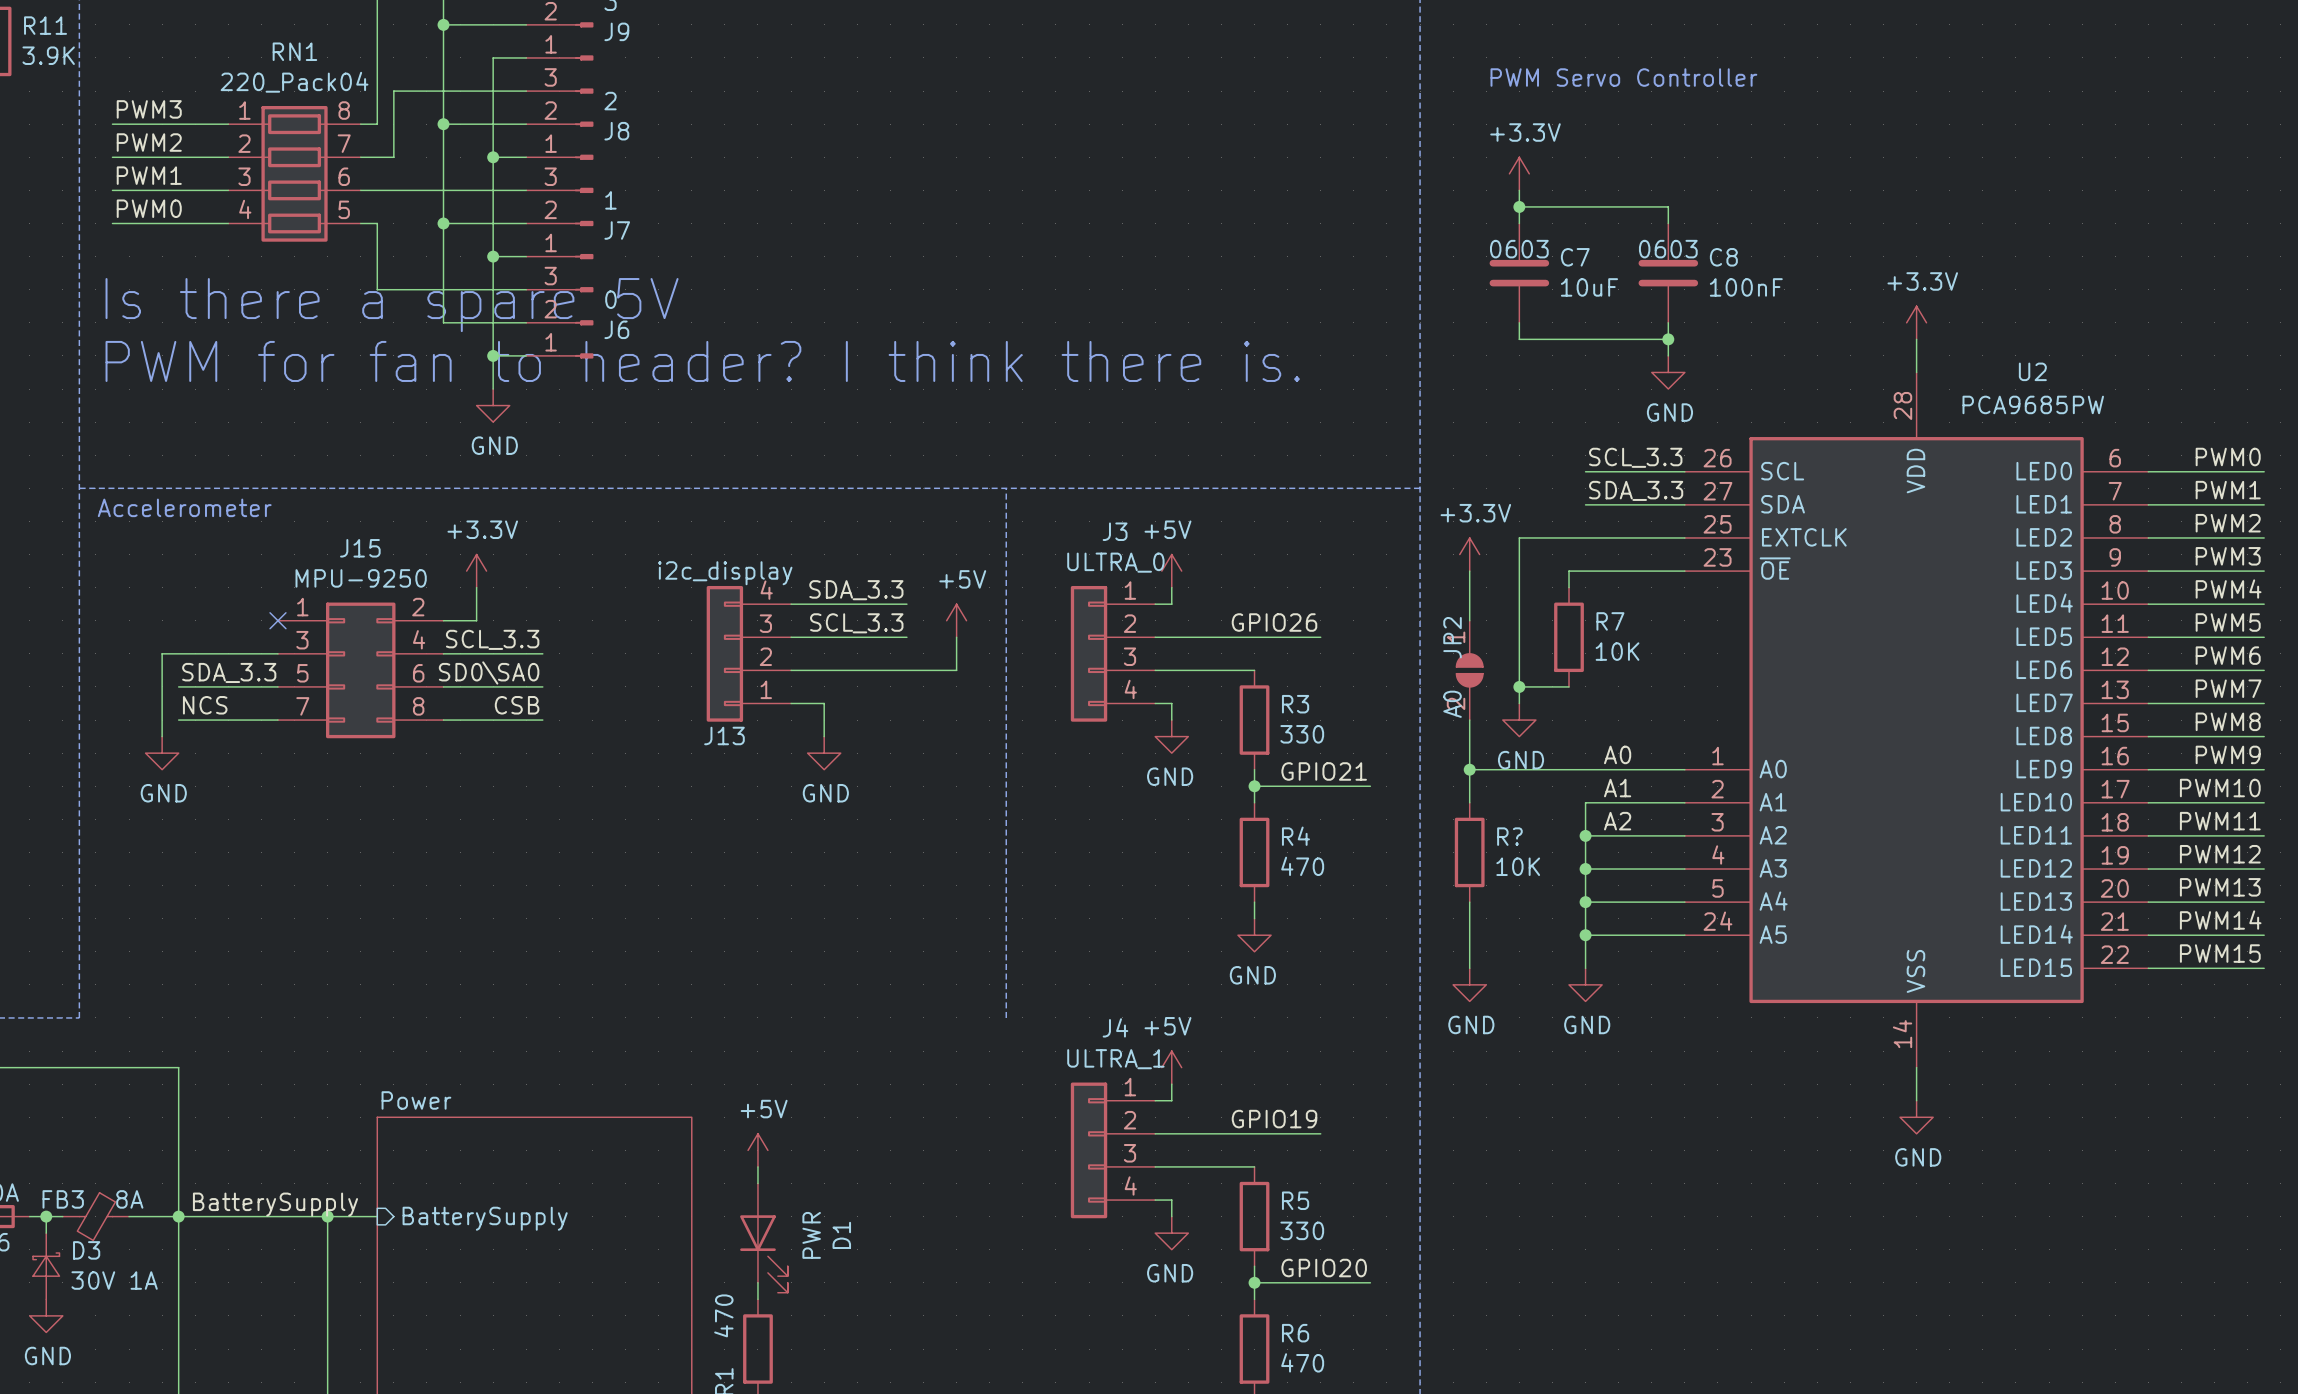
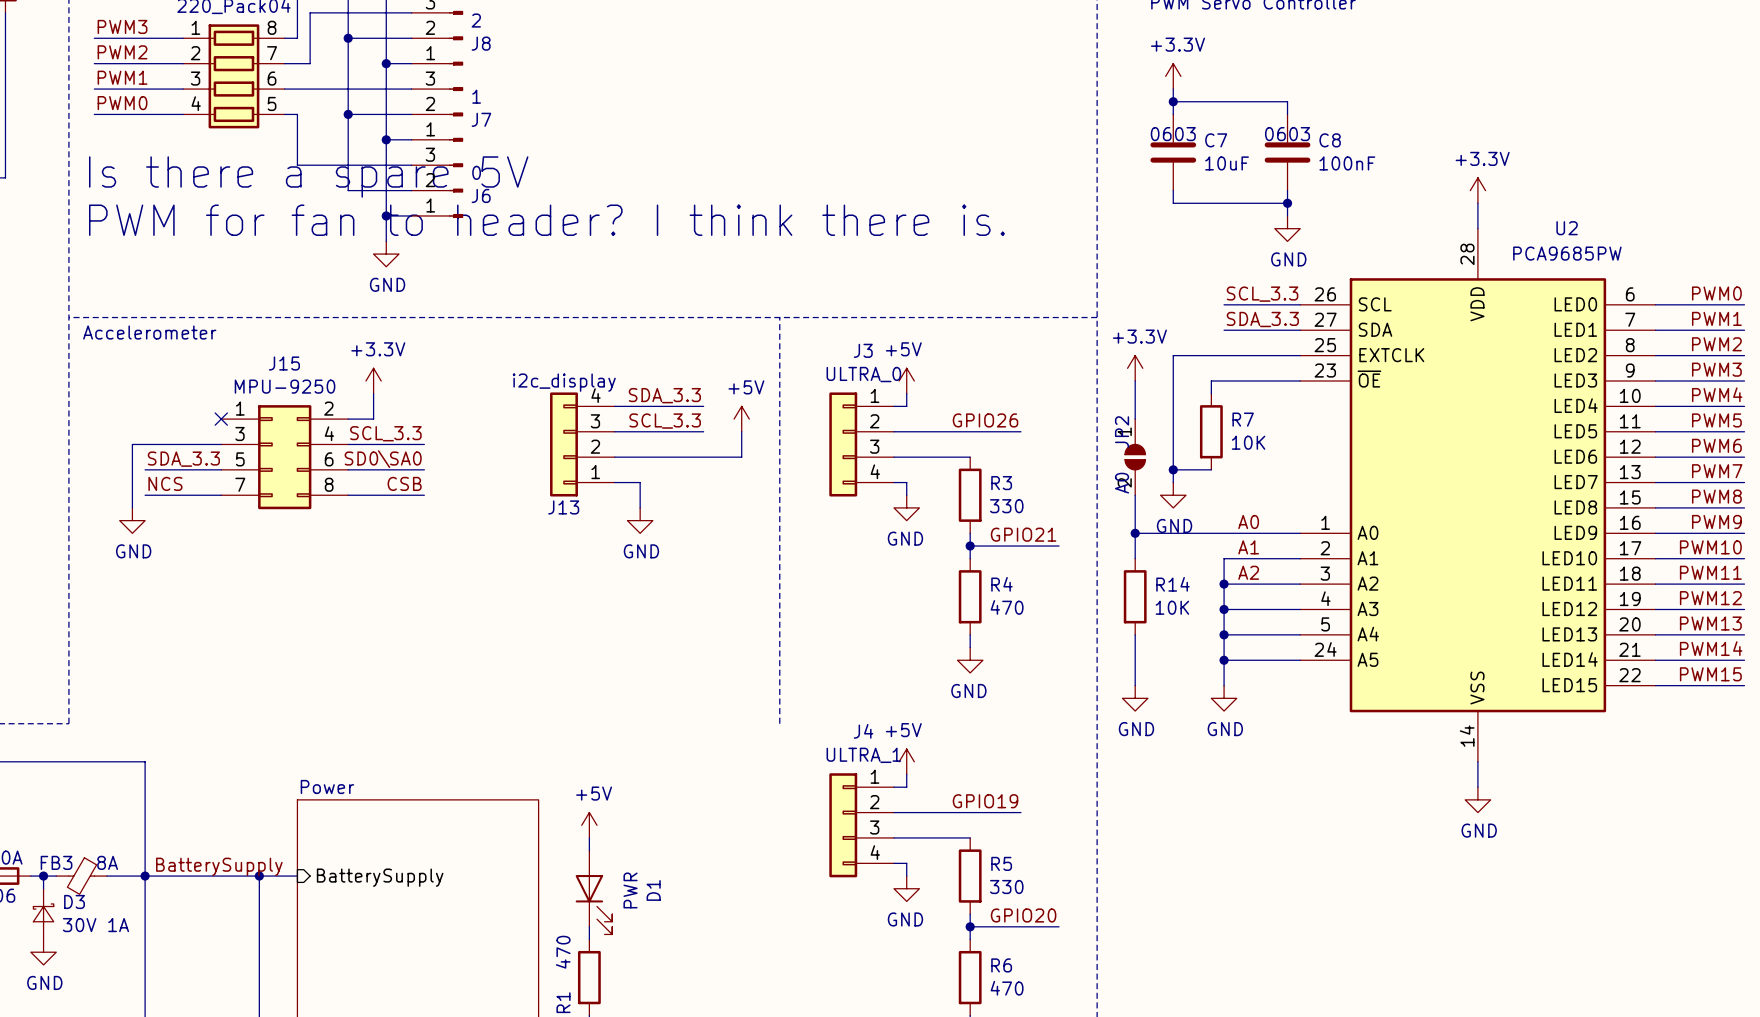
R? name: R? (1509, 836) -> R14 (1173, 584)

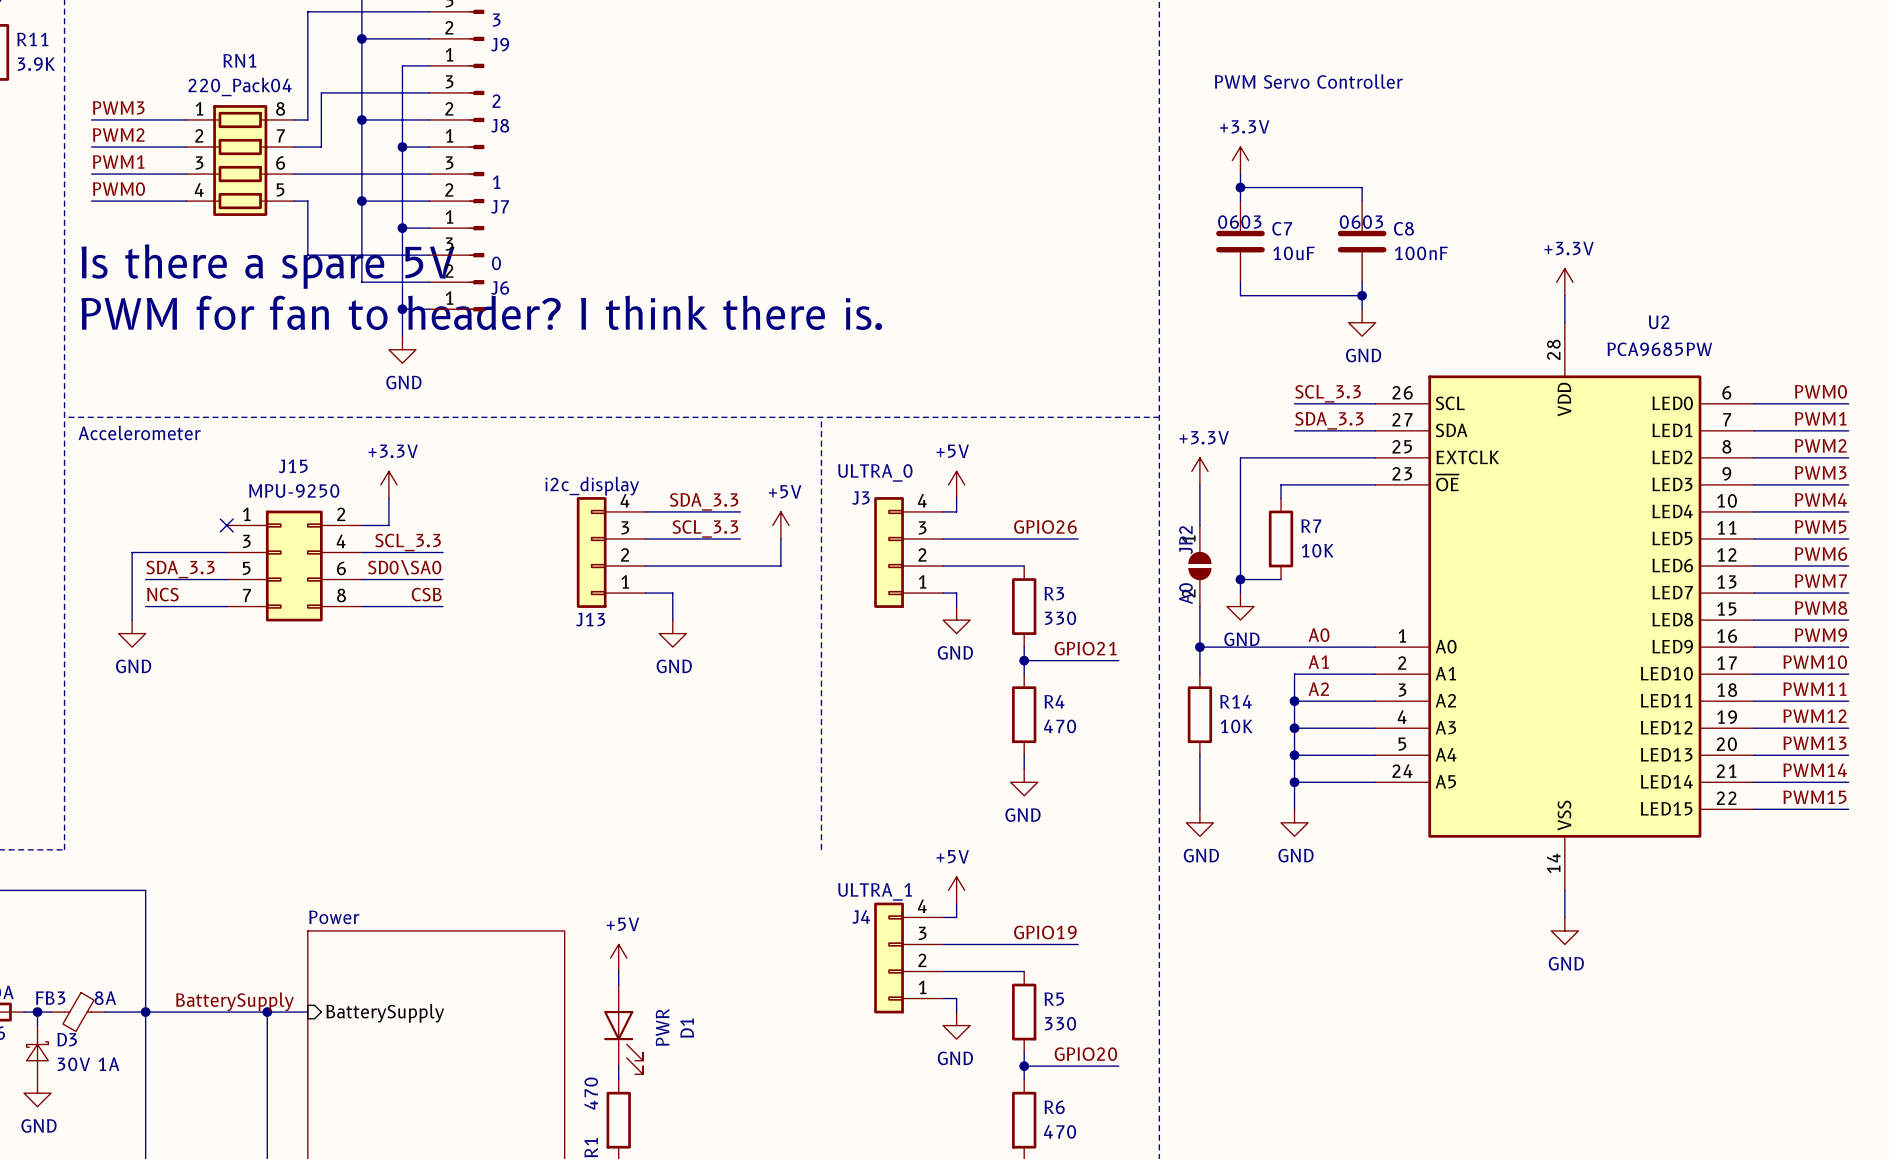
J3 name position: J3 (863, 350) -> J3 (860, 498)
J3 value position: ULTRA_0 (863, 374) -> ULTRA_0 (875, 472)
J3 flip: as is (843, 444) -> up-down (889, 552)
J4 name position: J4 (863, 731) -> J4 (861, 917)
J4 value position: ULTRA_1 (863, 755) -> ULTRA_1 (875, 891)
J4 flip: as is (843, 825) -> up-down (889, 957)

